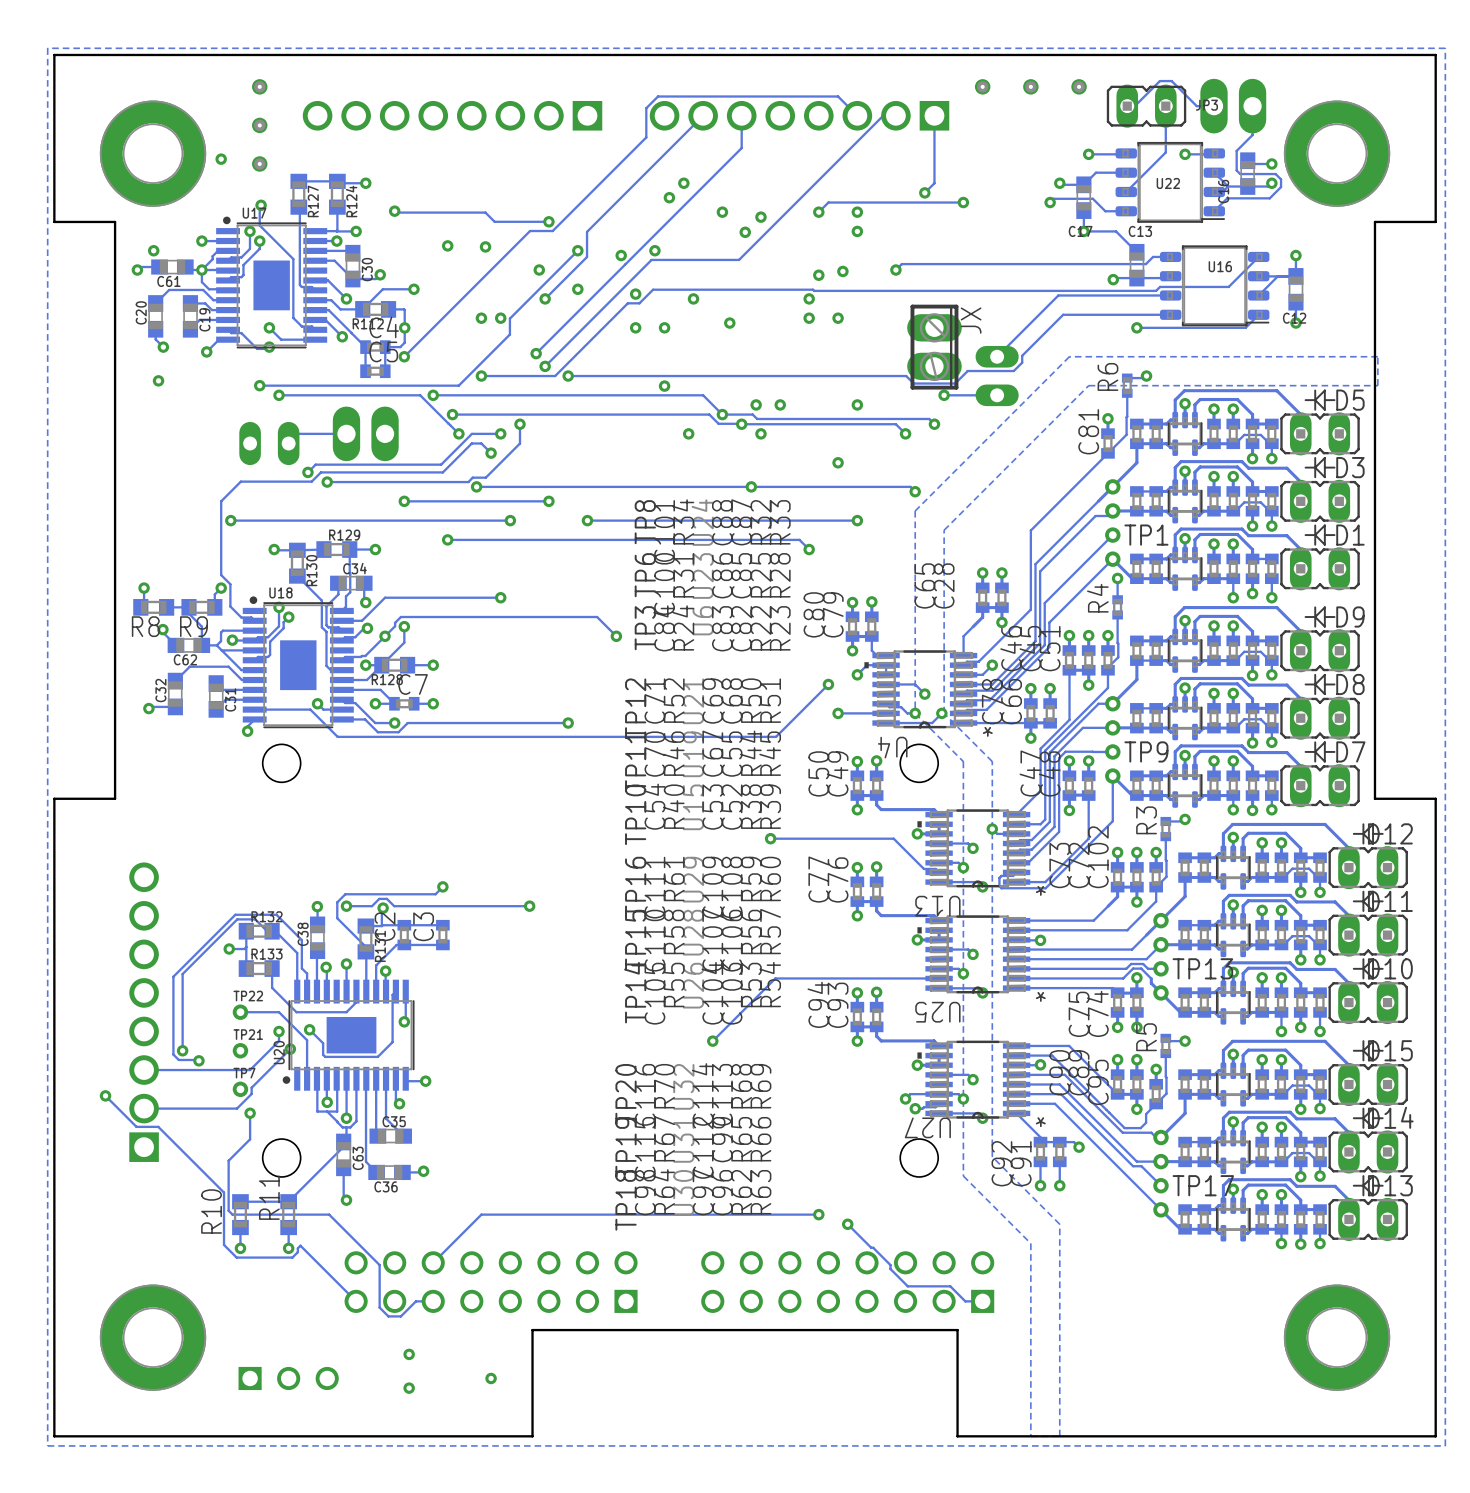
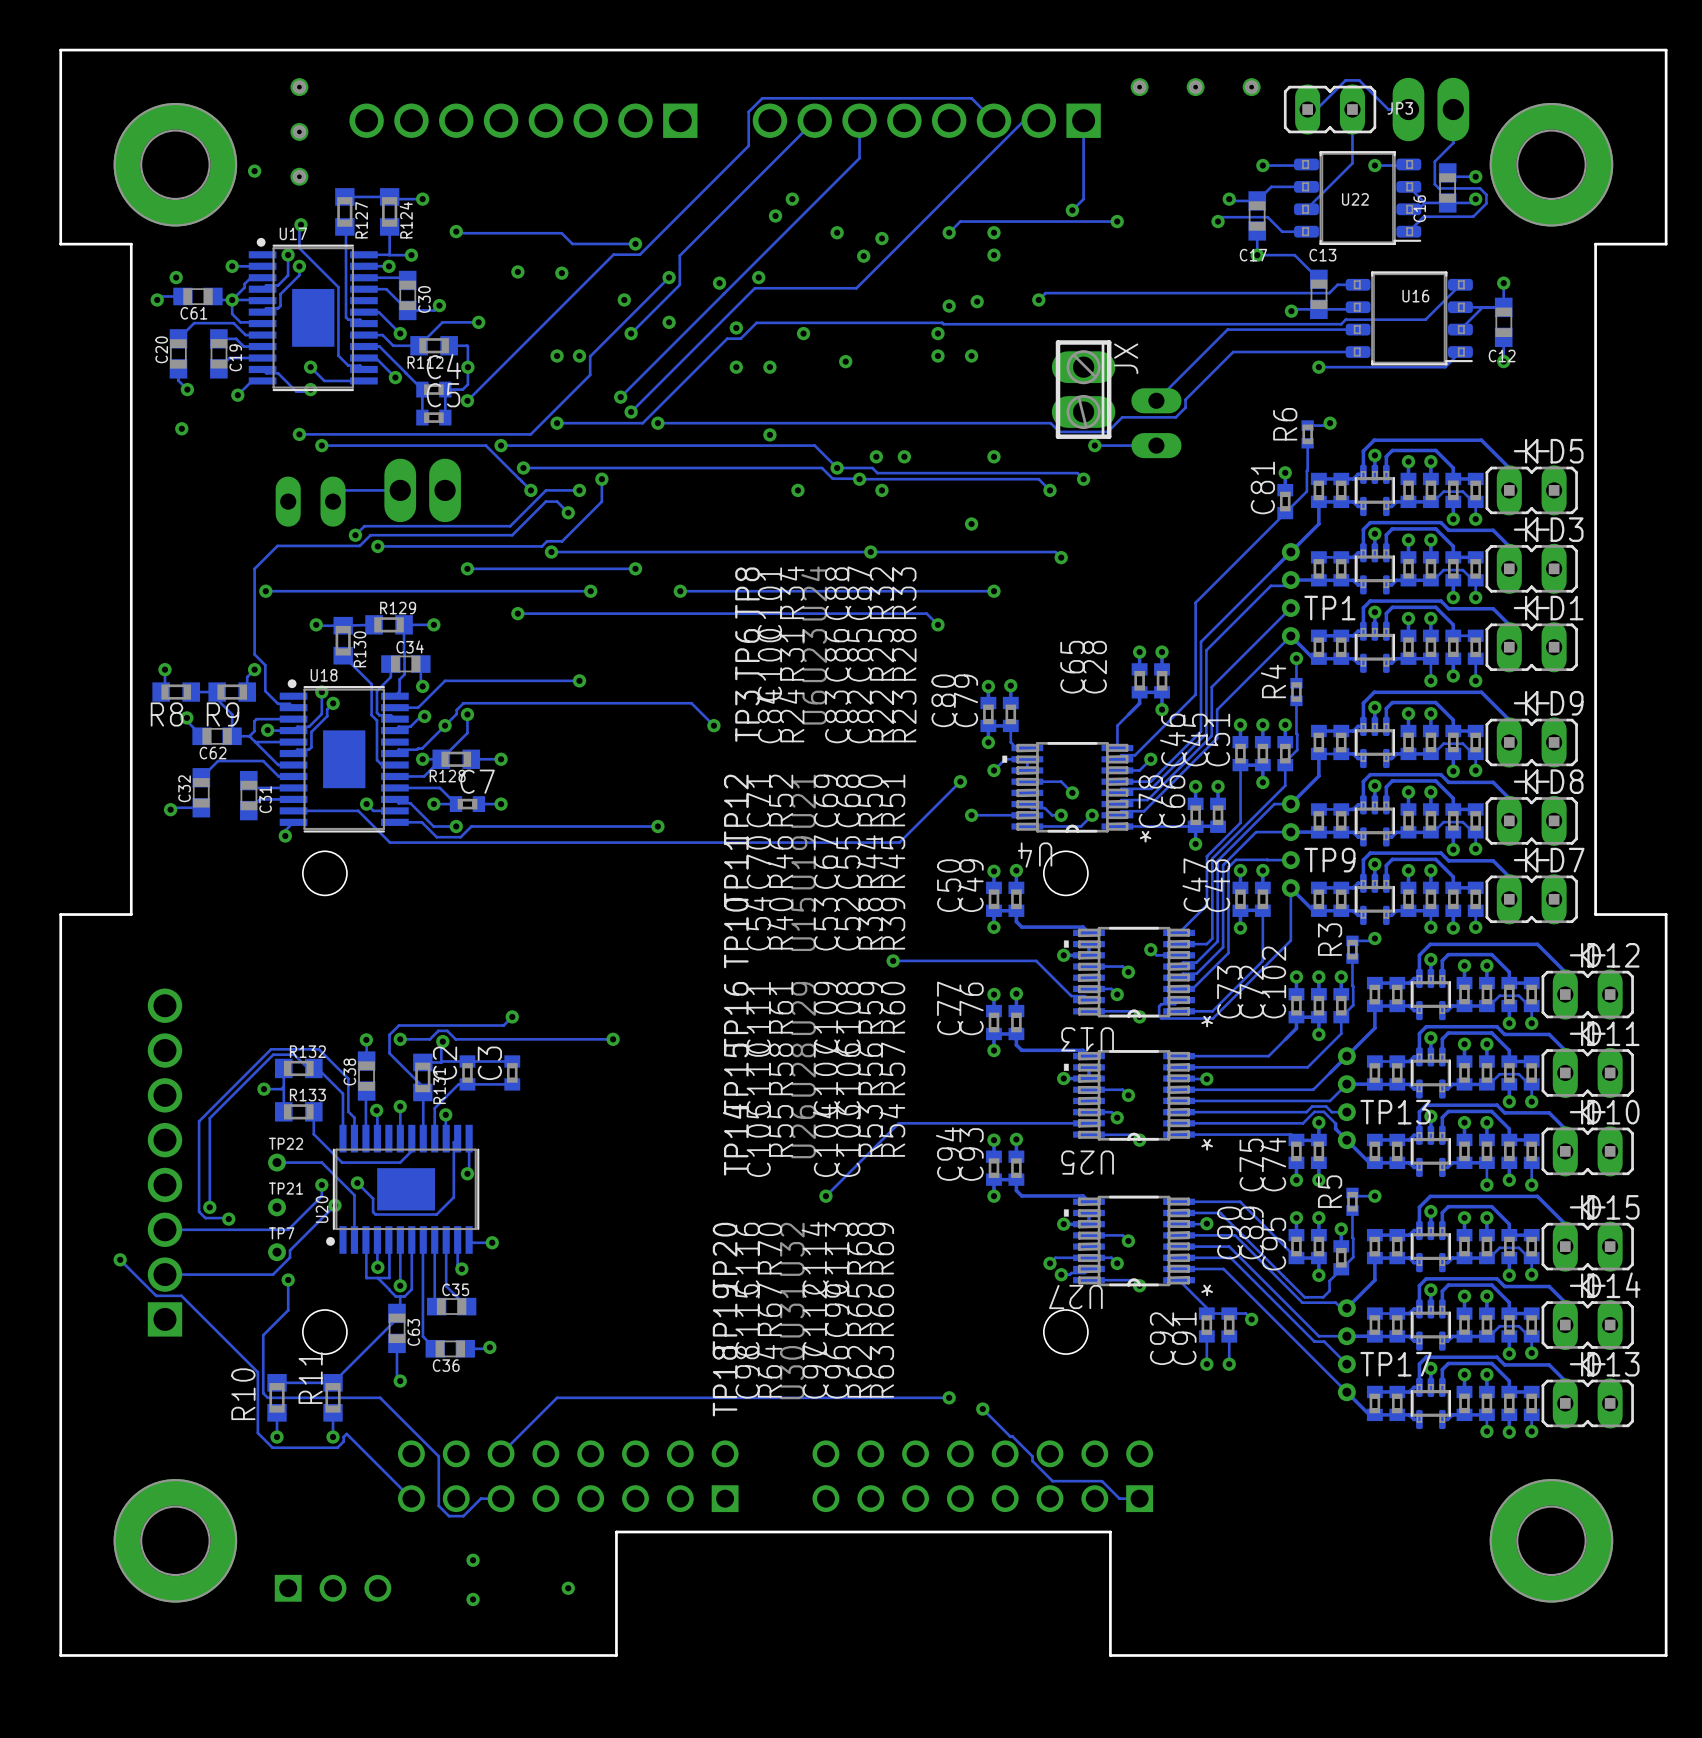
zone outline: (1445, 48) (1445, 1445) (47, 1445) (47, 48) (1445, 48) -> none
zone outline: (1377, 356) (1377, 385) (1088, 385) (944, 530) (944, 713) (992, 761) (992, 1156) (1059, 1224) (1059, 1436) (1030, 1436) (1030, 1243) (963, 1176) (963, 761) (915, 713) (915, 510) (1069, 356) (1377, 356) -> none

